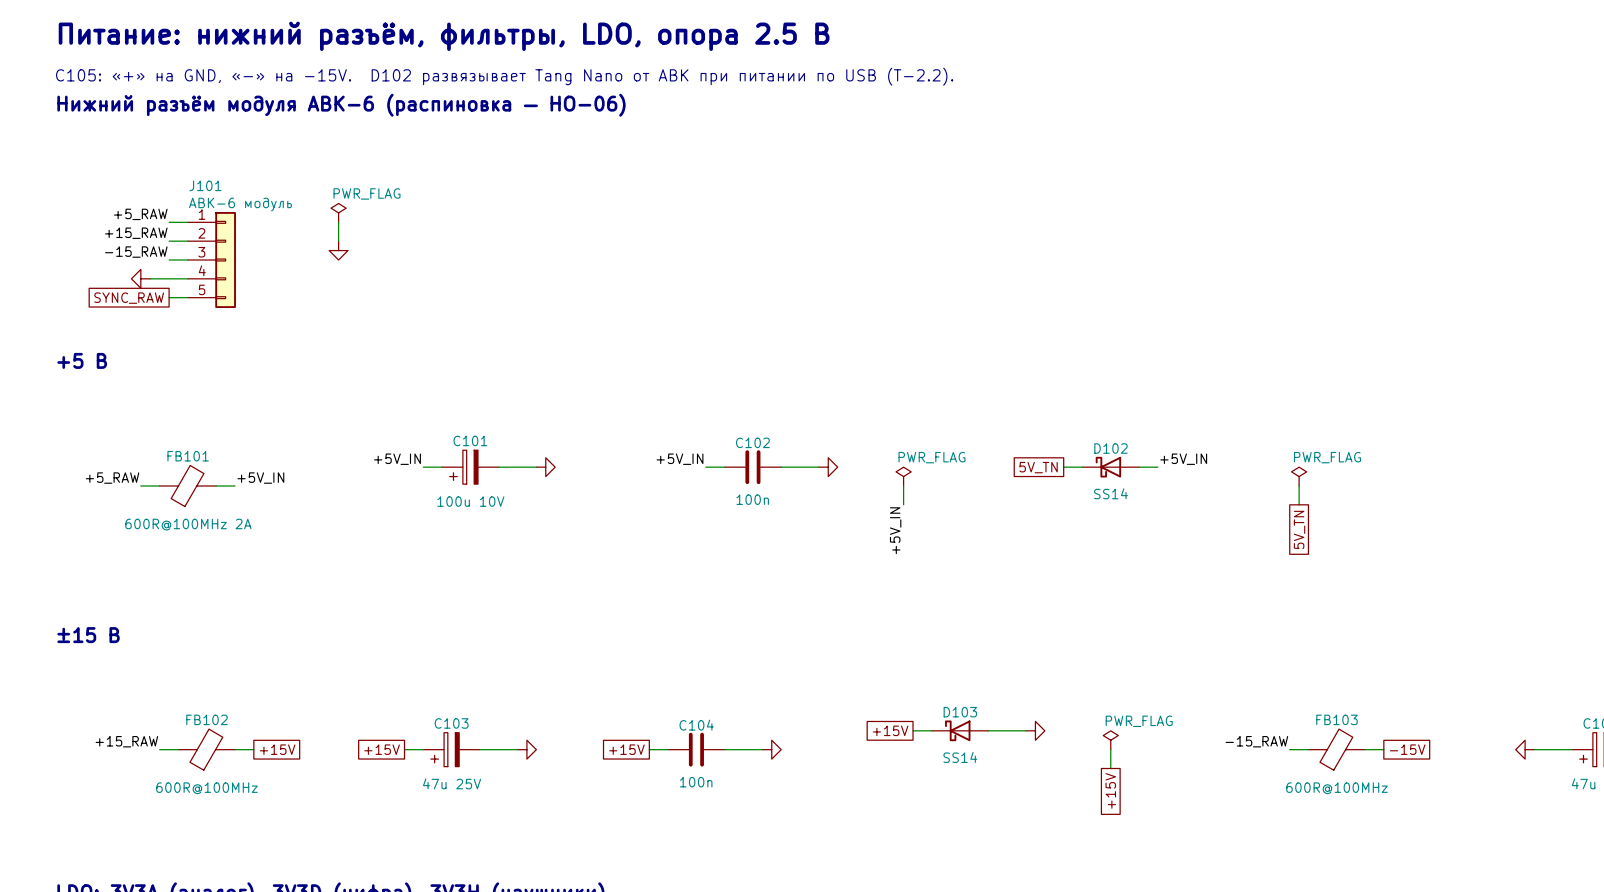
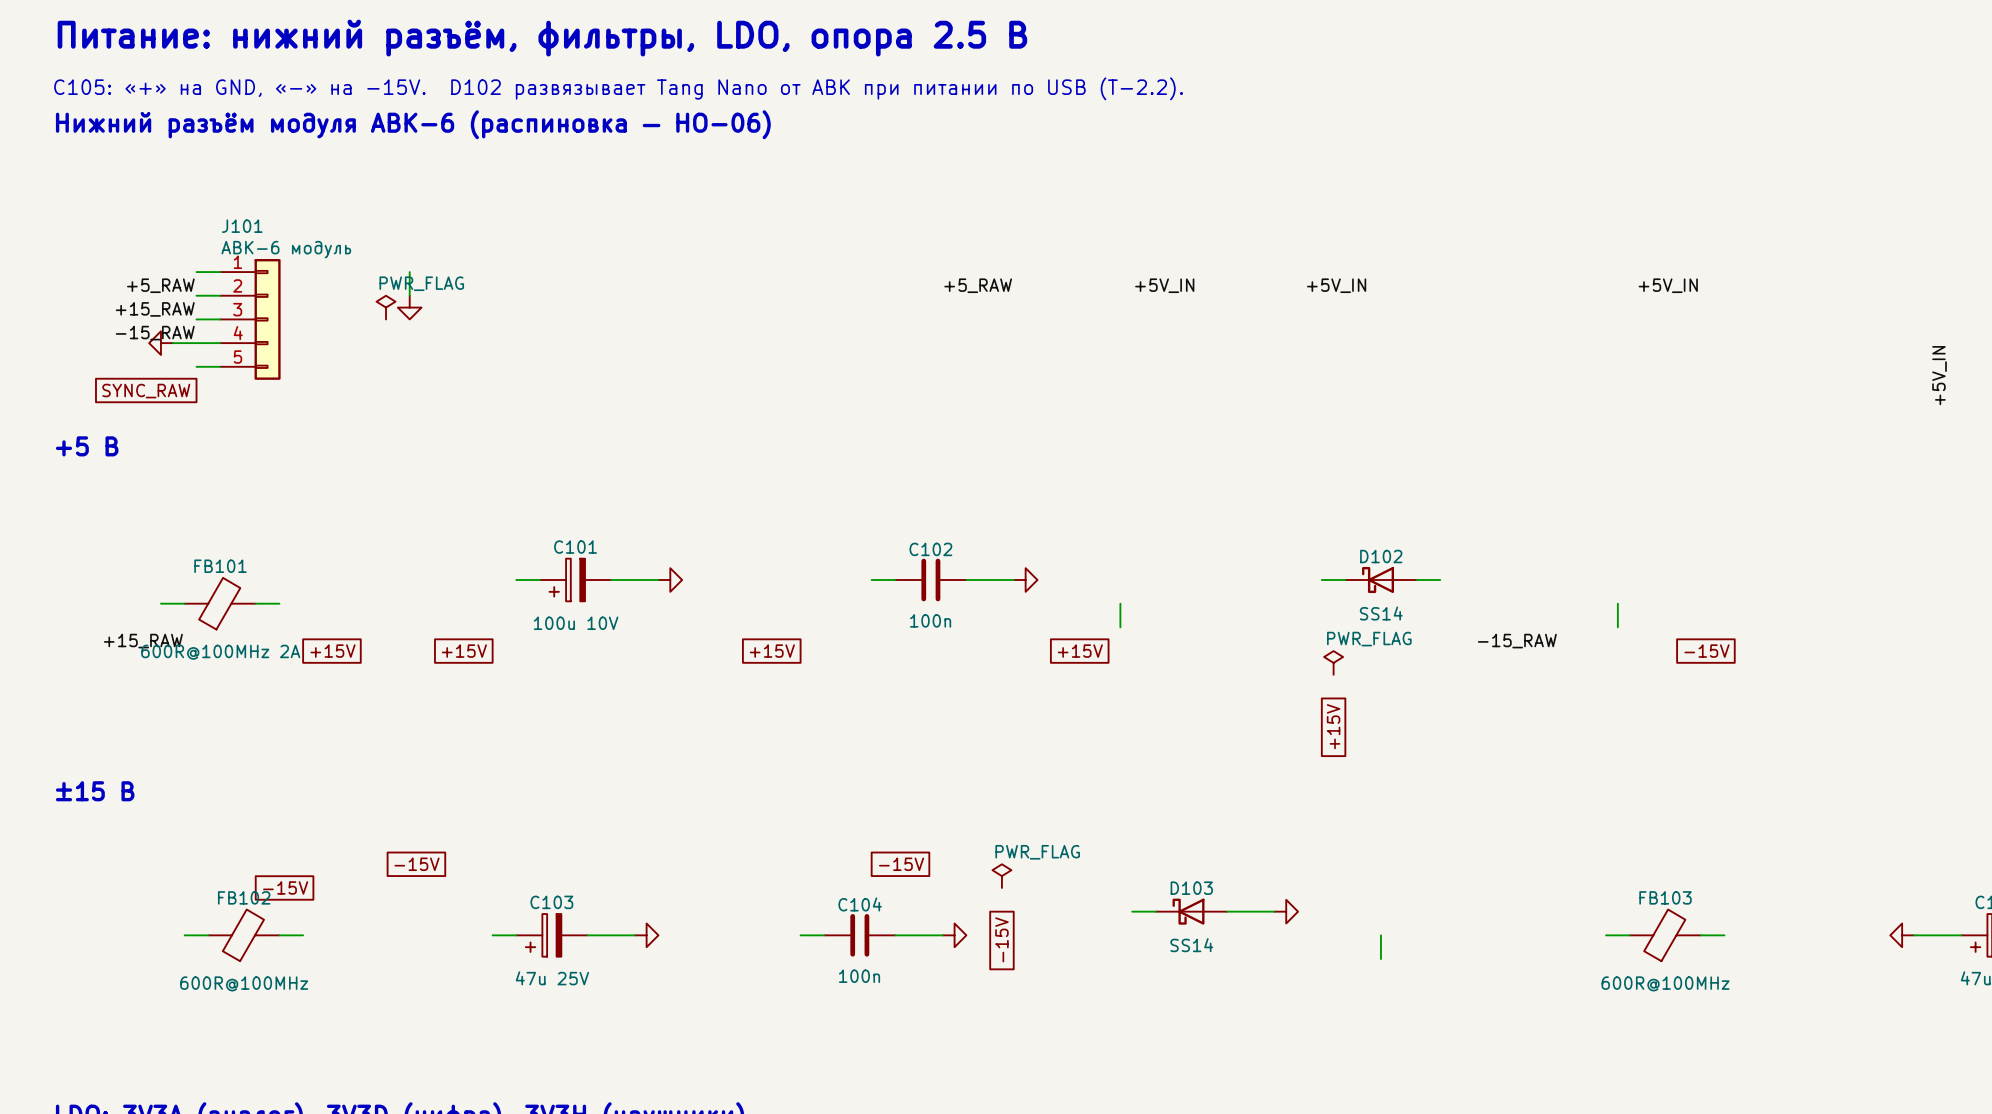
power symbol position: PWR_FLAG (338, 212) -> PWR_FLAG (386, 307)
label: +5_RAW (140, 214) -> none
label: +15_RAW (136, 233) -> +5_RAW (160, 285)
label: none -> +5_RAW (978, 285)
label: none -> +5V_IN (1164, 285)
label: none -> +5V_IN (1336, 285)
label: none -> +5V_IN (1668, 285)
label: -15_RAW (136, 252) -> +15_RAW (155, 309)
label: none -> -15_RAW (155, 333)
global label position: SYNC_RAW (129, 298) -> SYNC_RAW (146, 391)
label: none -> +5V_IN (1939, 375)
label: +5V_IN (397, 459) -> none
label: +5V_IN (679, 459) -> none
label: +5V_IN (1183, 459) -> none
global label: 5V_TN (1038, 467) -> none
power symbol: PWR_FLAG (903, 476) -> none
power symbol: PWR_FLAG (1299, 476) -> none
label: +5_RAW (112, 478) -> none
label: +5V_IN (260, 478) -> none
label: none -> +15_RAW (143, 641)
label: none -> -15_RAW (1517, 641)
global label: none -> +15V (333, 651)
global label: none -> +15V (464, 651)
global label: none -> +15V (772, 651)
global label: none -> +15V (1080, 651)
global label: none -> -15V (1707, 651)
global label: 5V_TN (1299, 529) -> none
label: +5V_IN (895, 530) -> none
power symbol: none -> PWR_FLAG (1333, 662)
global label: none -> +15V (1333, 726)
global label: none -> -15V (417, 864)
global label: none -> -15V (901, 864)
power symbol: none -> PWR_FLAG (1001, 876)
global label: none -> -15V (285, 887)
global label: +15V (890, 730) -> none
power symbol: PWR_FLAG (1110, 740) -> none
label: +15_RAW (126, 741) -> none
label: -15_RAW (1256, 741) -> none
global label: +15V (277, 749) -> none
global label: +15V (382, 749) -> none
global label: +15V (626, 749) -> none
global label: -15V (1407, 749) -> none
global label: none -> -15V (1001, 939)
global label: +15V (1110, 790) -> none

